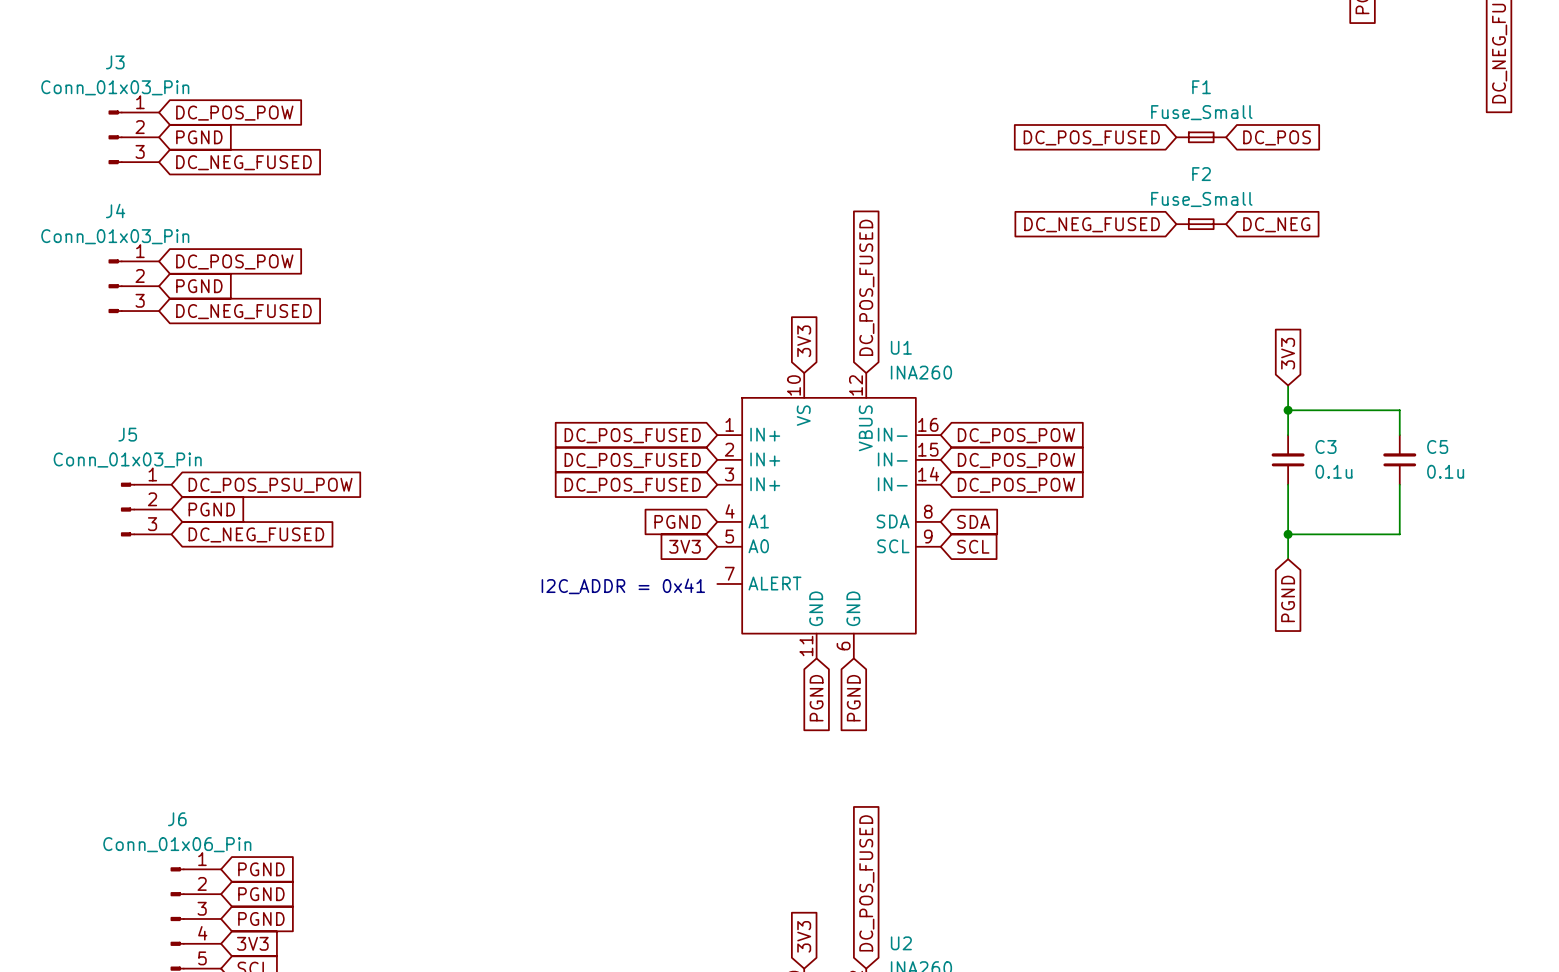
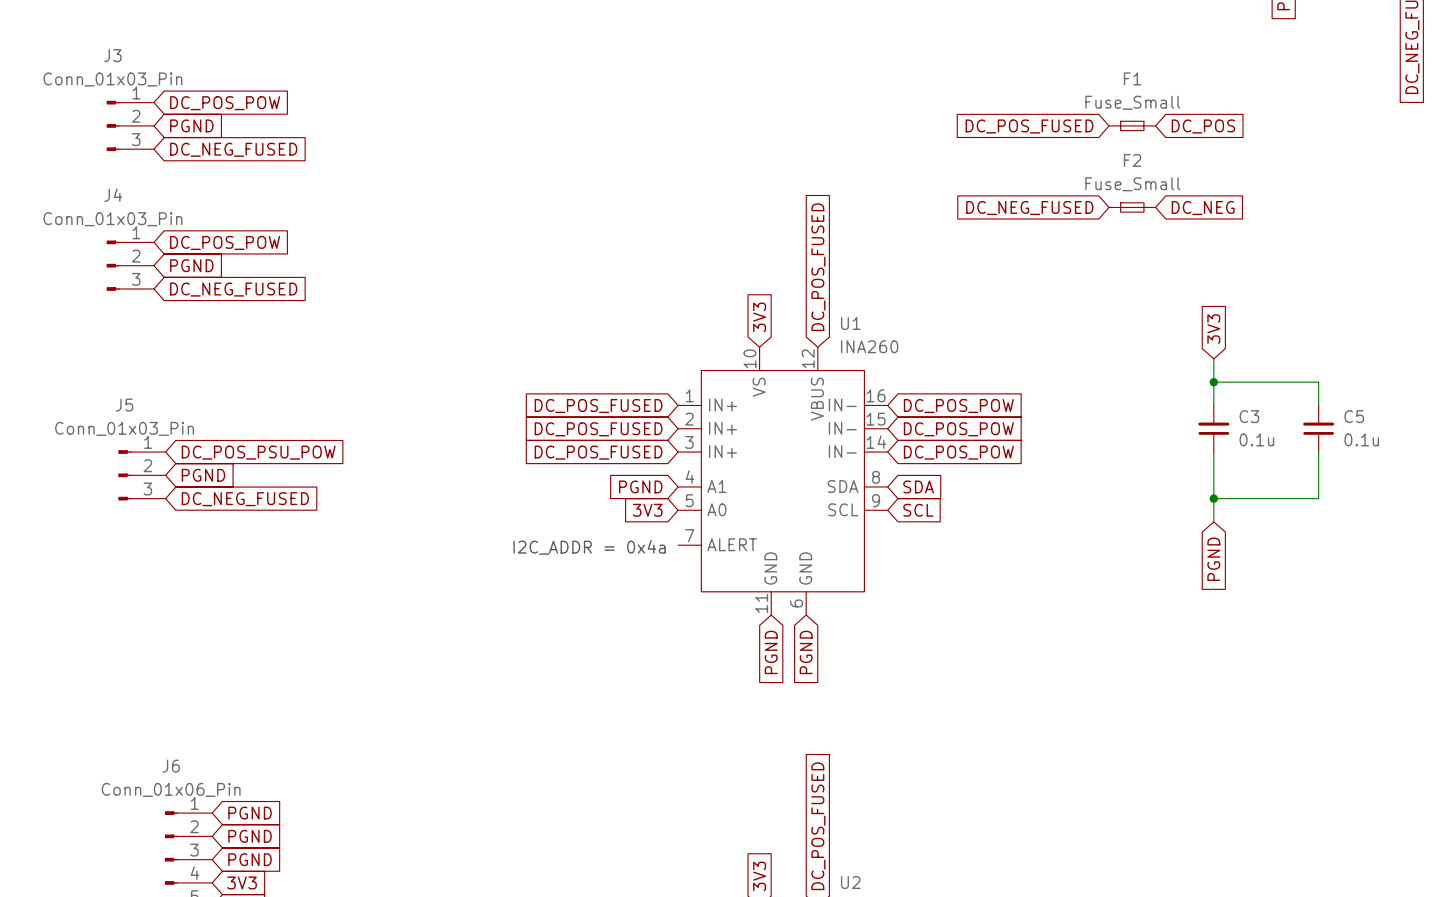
text: I2C_ADDR = 0x41 (623, 586) -> I2C_ADDR = 0x4a (589, 547)

